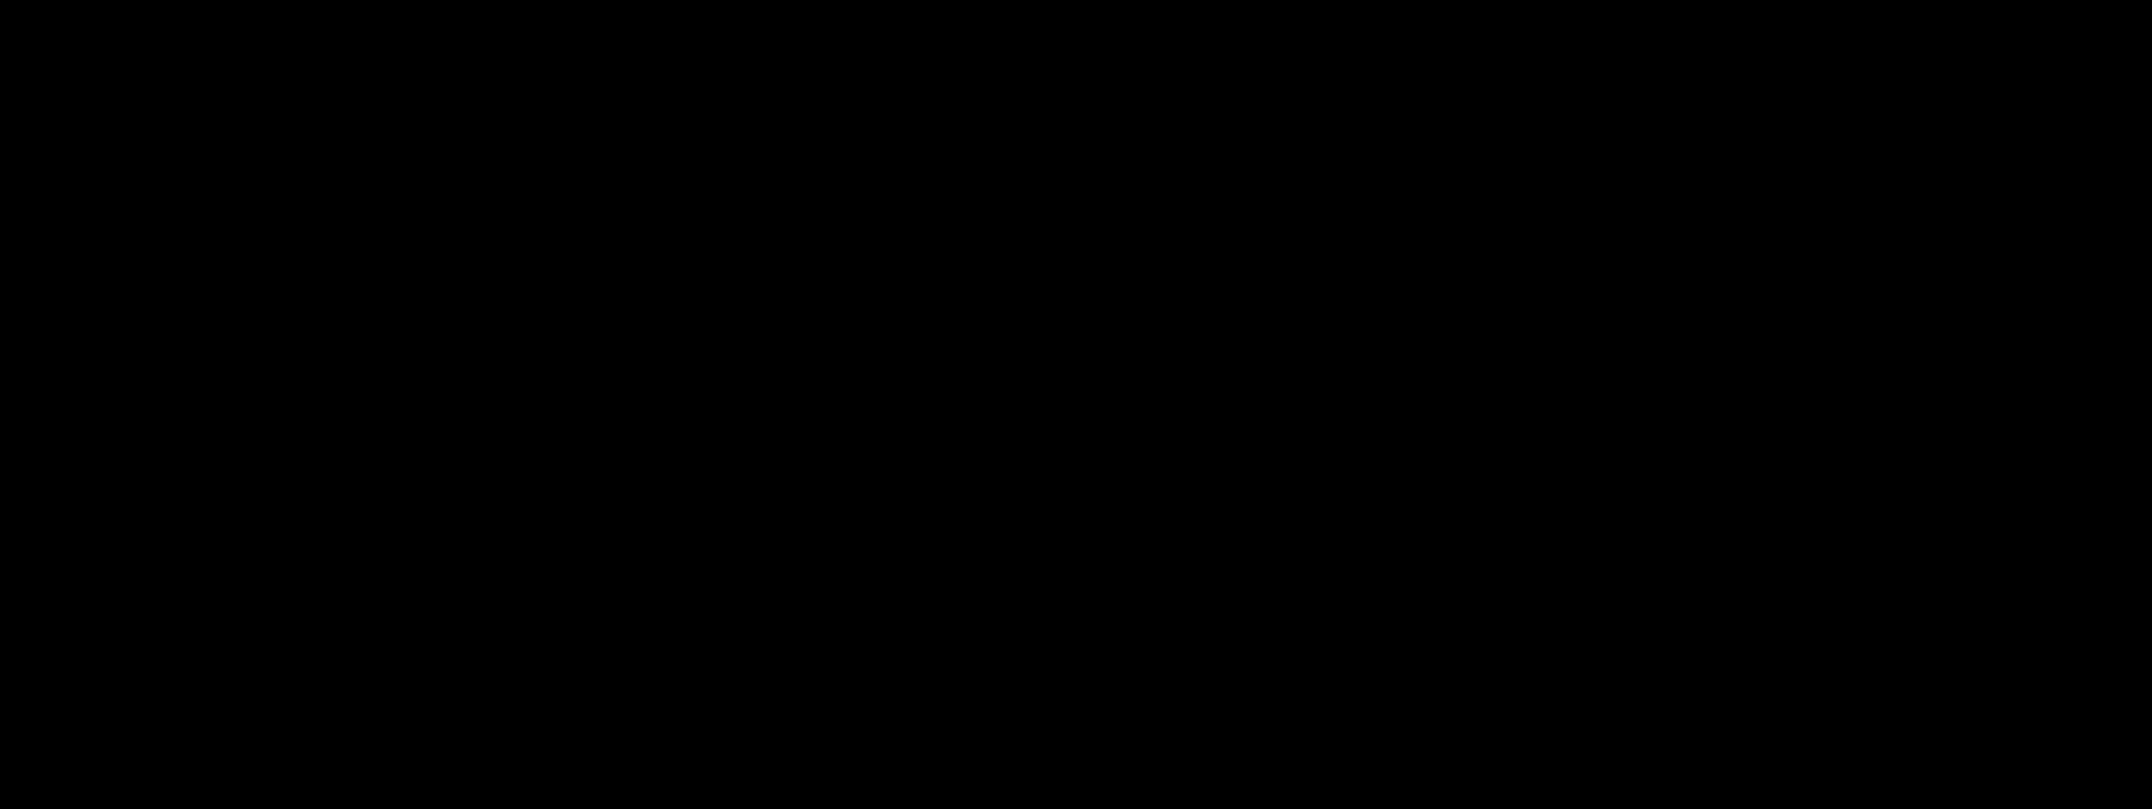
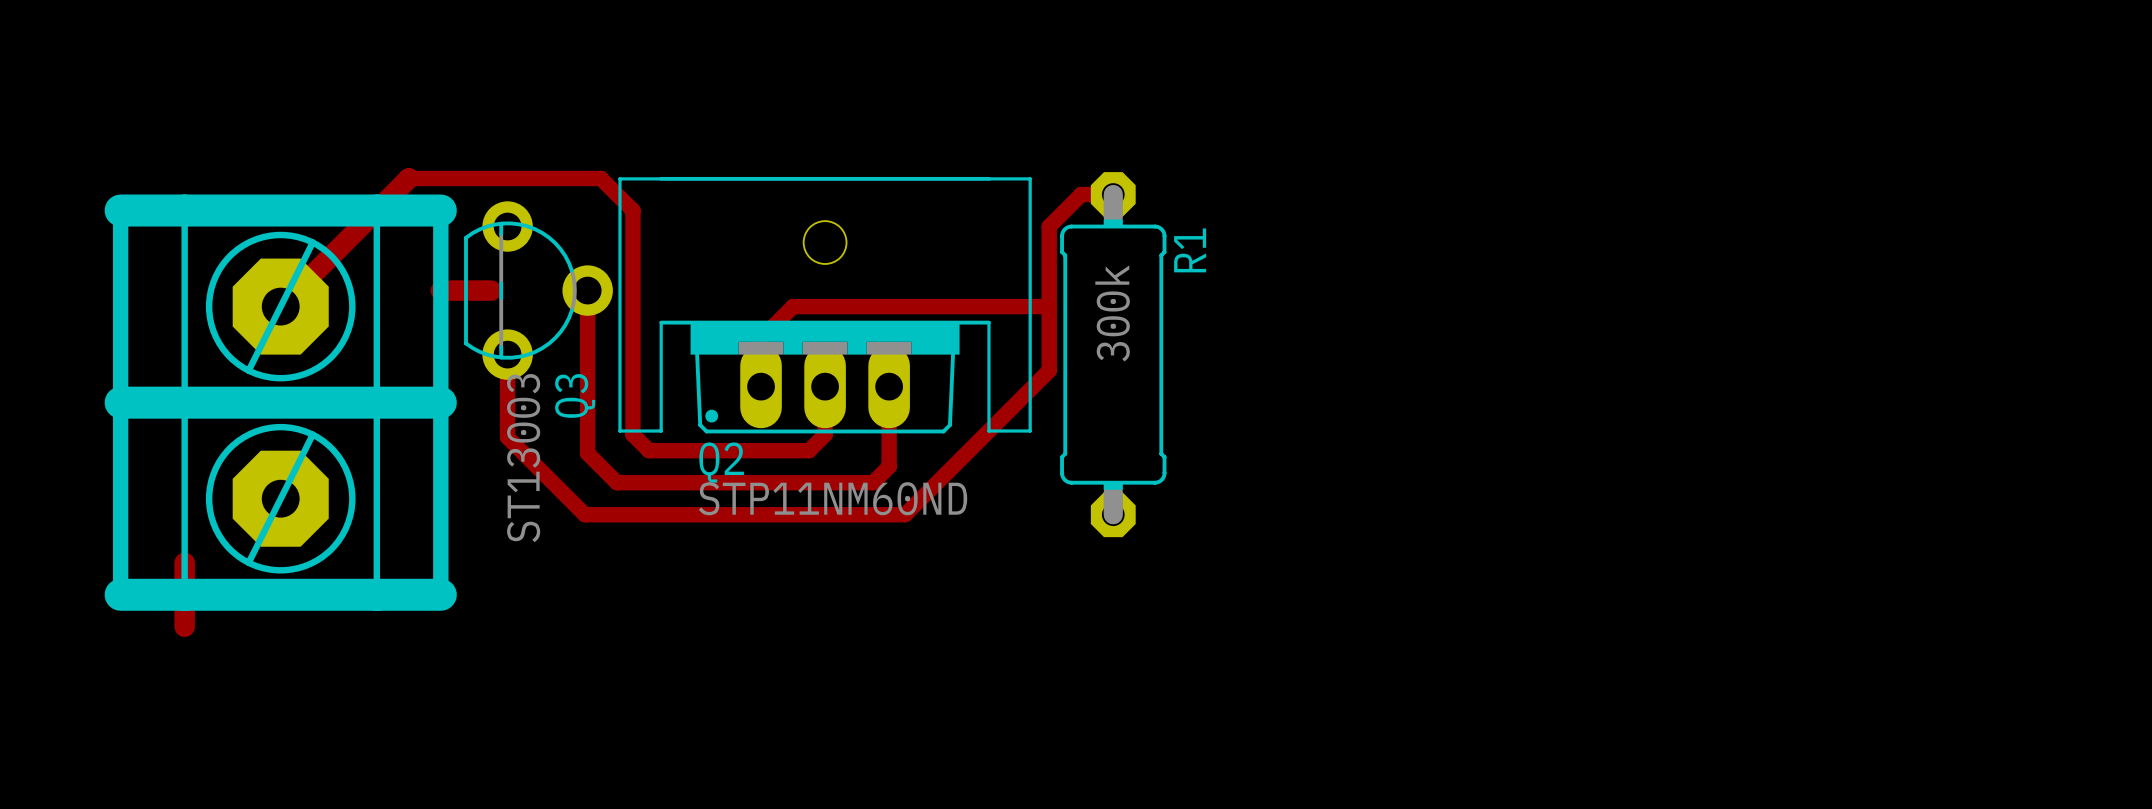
top track: none -> (1113, 194) (1081, 194) (1049, 226) (1049, 370) (905, 514) (584, 514) (507, 437) (507, 354)
top track: none -> (491, 290) (440, 290)
Q3: none -> ST13003 (538, 290)
top track: none -> (587, 290) (587, 453) (616, 482) (873, 482) (889, 466) (889, 386)
part: none -> (825, 304)
top track: none -> (280, 306) (408, 178) (600, 178) (632, 210) (632, 434) (648, 450) (809, 450) (825, 434) (825, 386)
top track: none -> (1049, 306) (793, 306) (761, 338) (761, 386)
R1: none -> 300k (1113, 354)
Q2: none -> STP11NM60ND (825, 377)
part: none -> (280, 402)
top track: none -> (184, 562) (184, 626)

